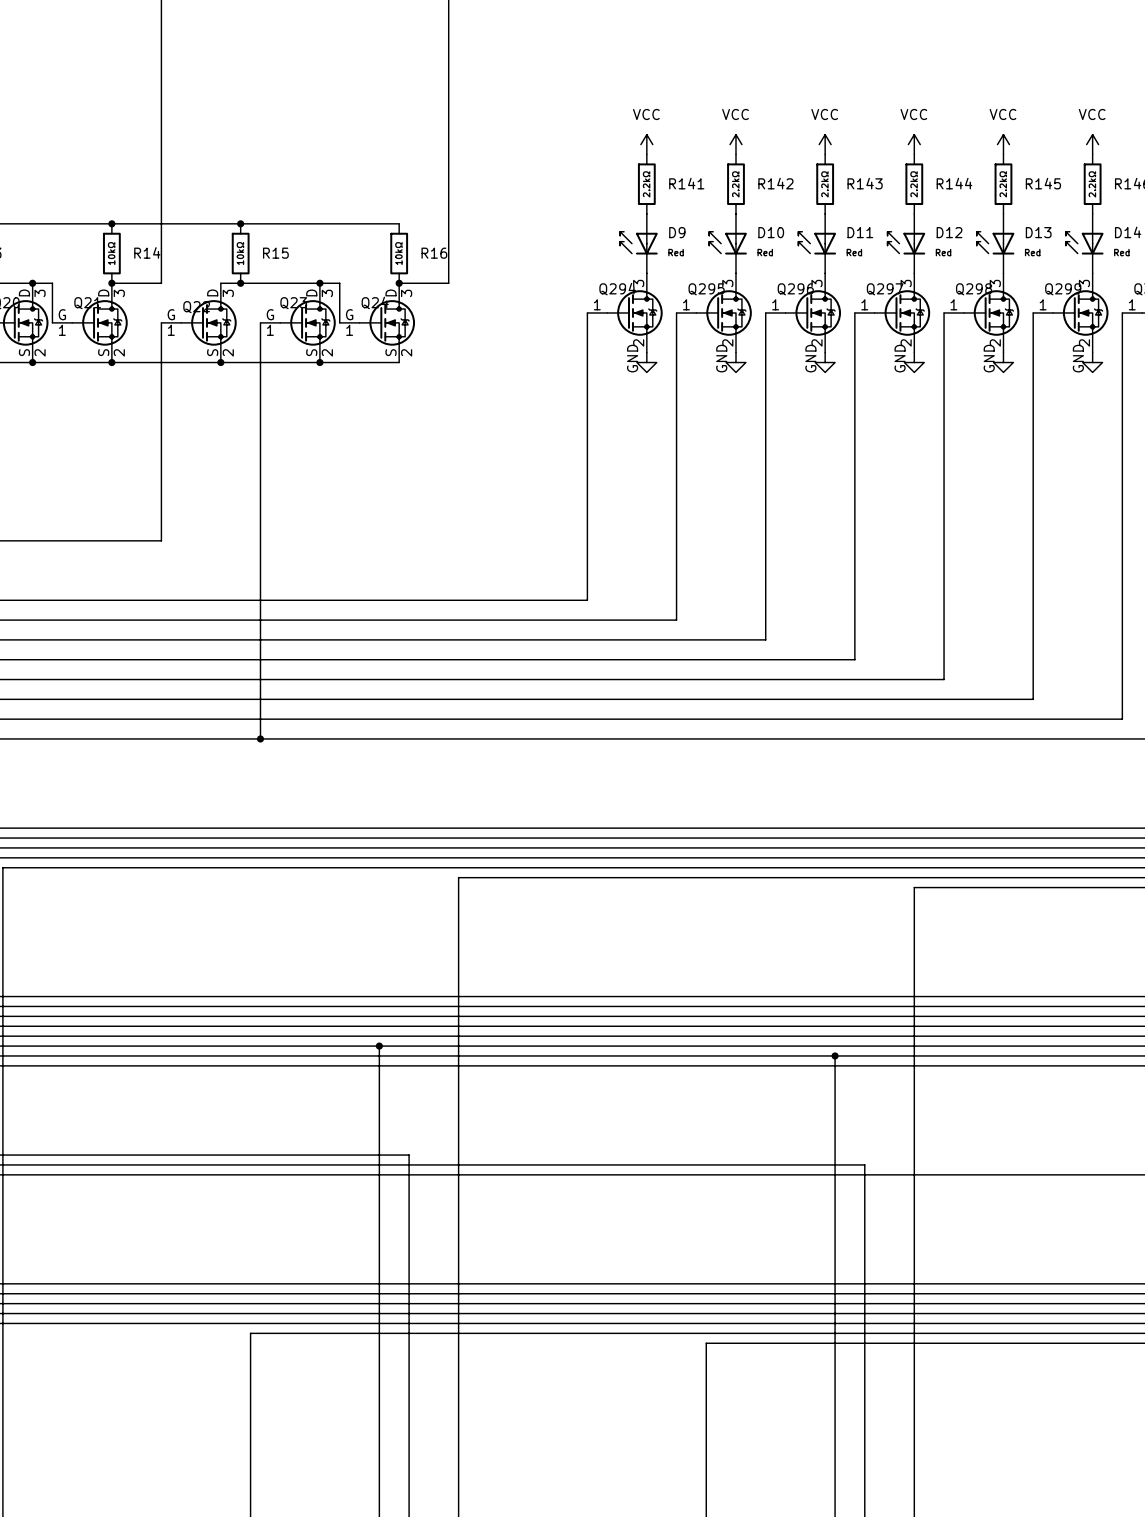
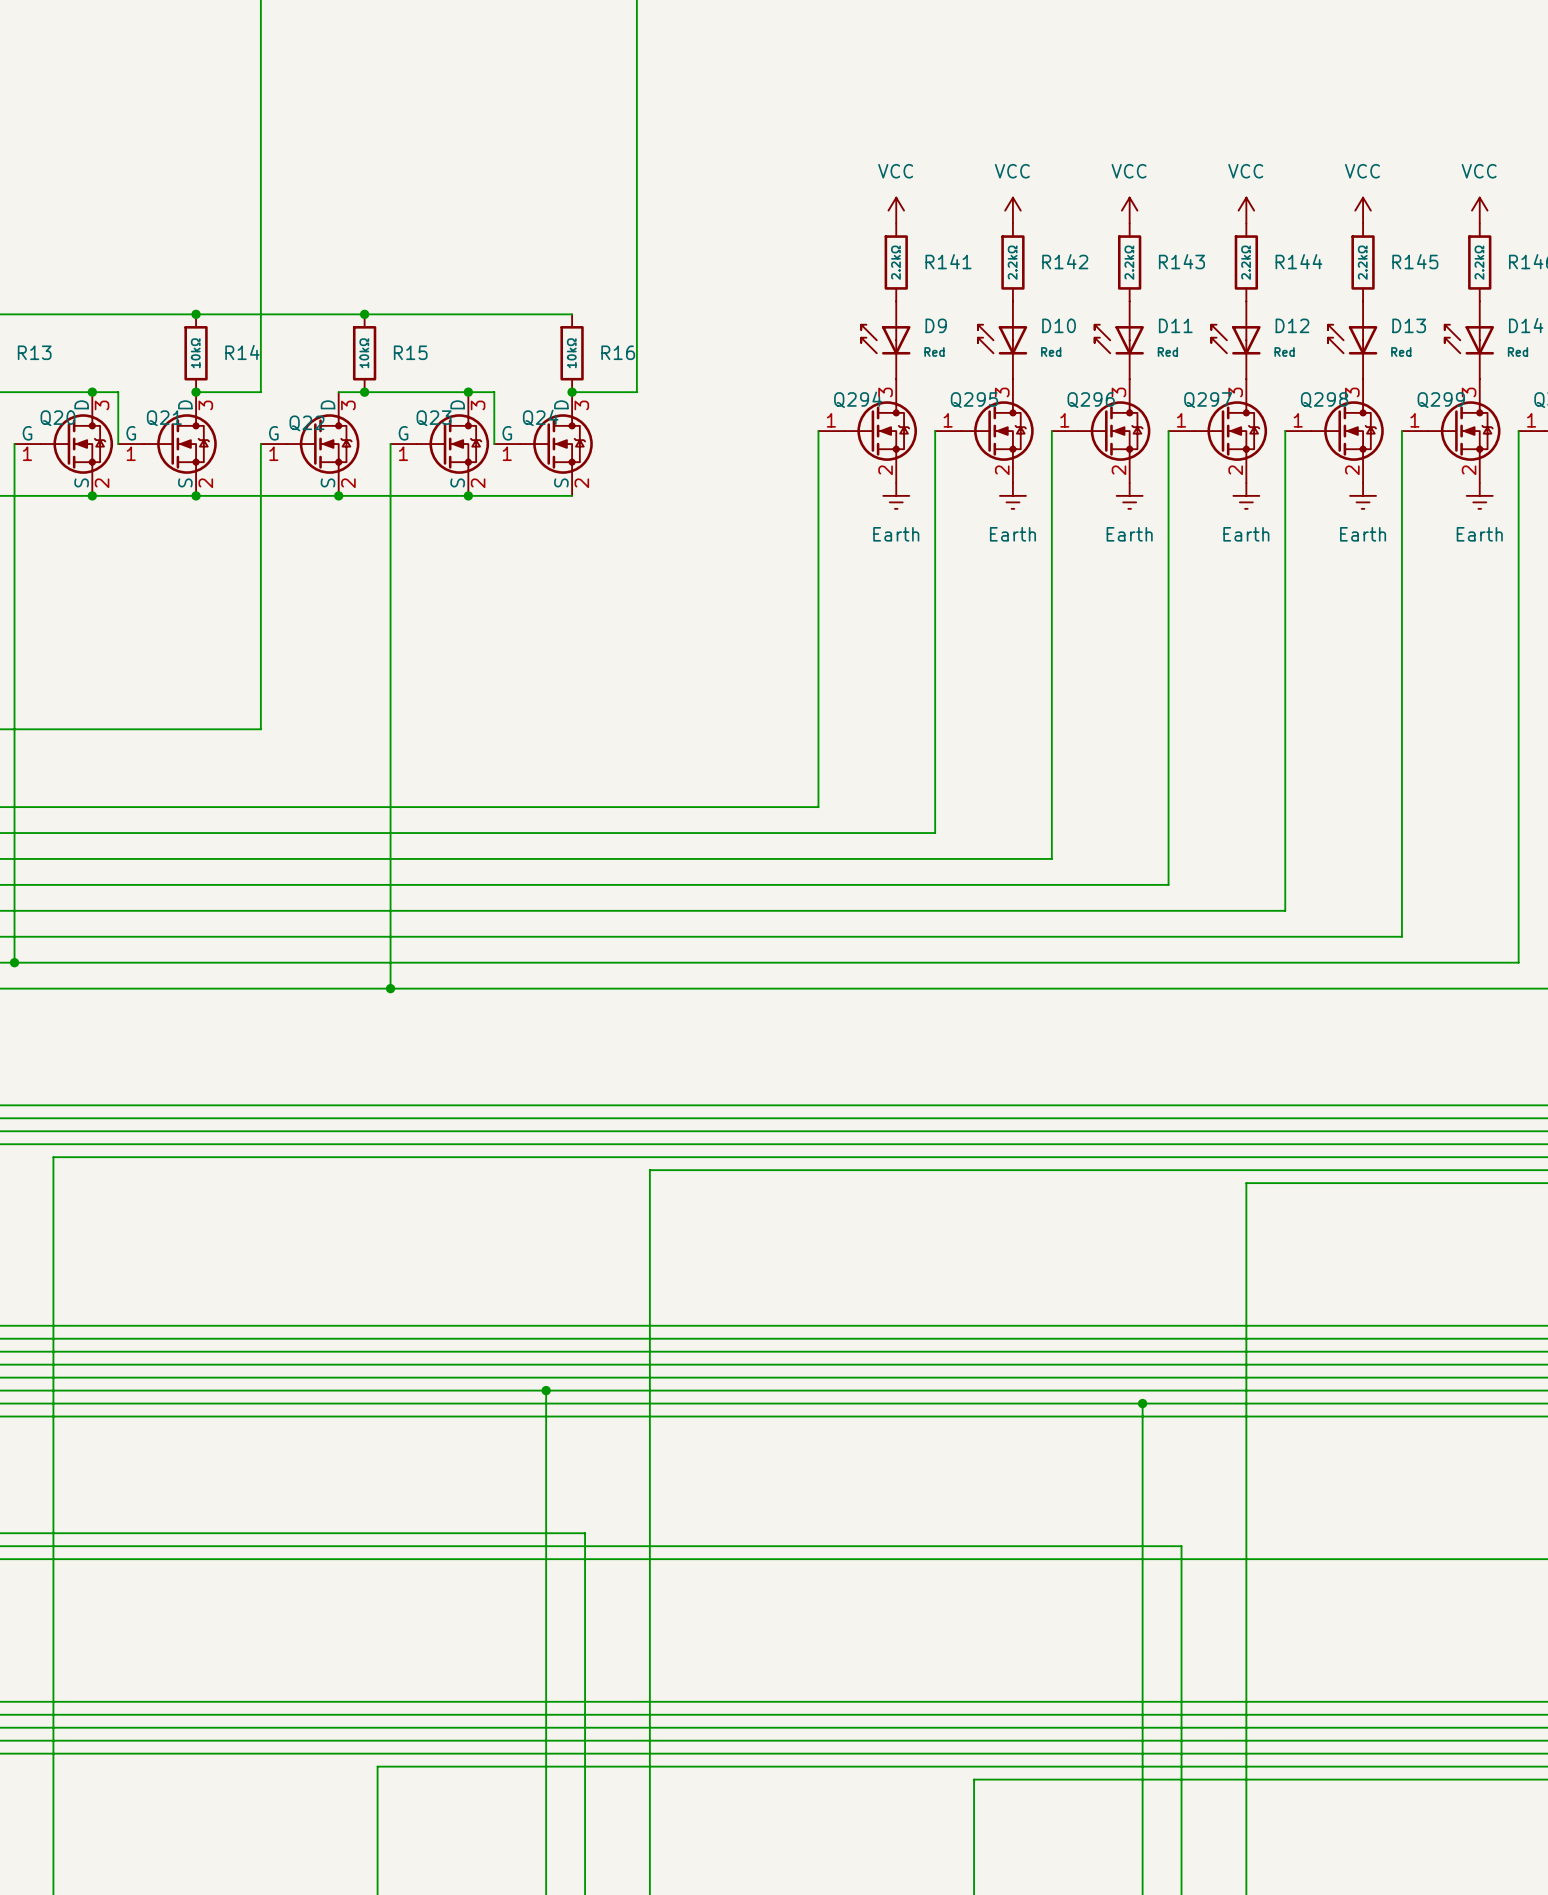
power symbol: GND (646, 362) -> Earth (896, 495)
power symbol: GND (735, 362) -> Earth (1012, 495)
power symbol: GND (825, 362) -> Earth (1129, 495)
power symbol: GND (914, 362) -> Earth (1246, 495)
power symbol: GND (1003, 362) -> Earth (1363, 495)
power symbol: GND (1092, 362) -> Earth (1479, 495)

